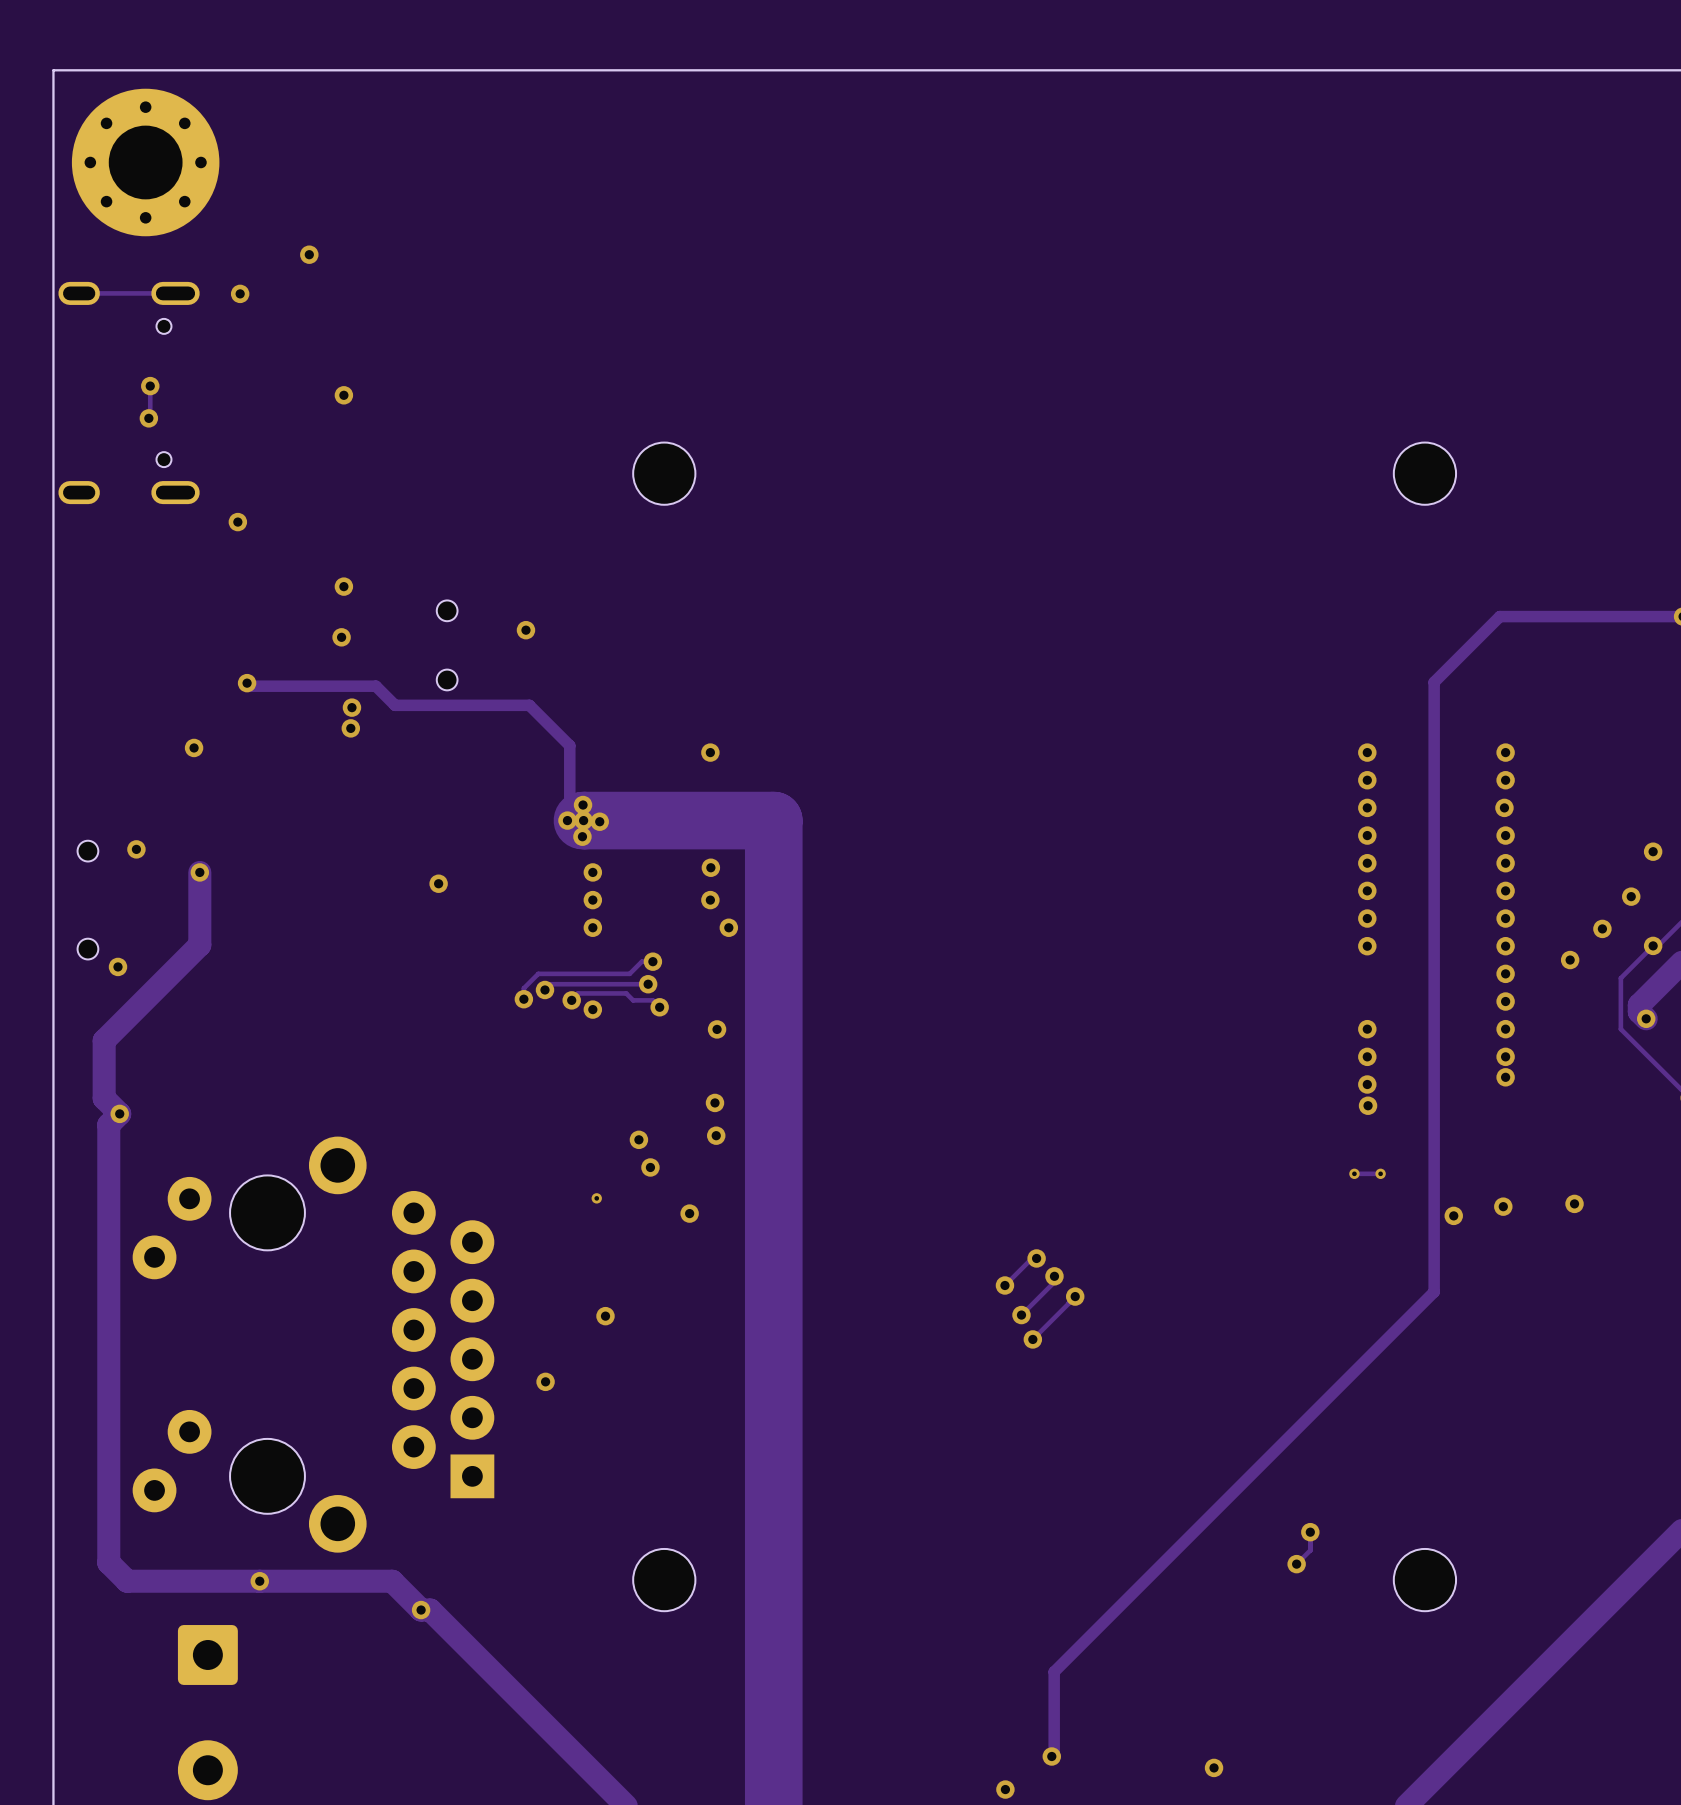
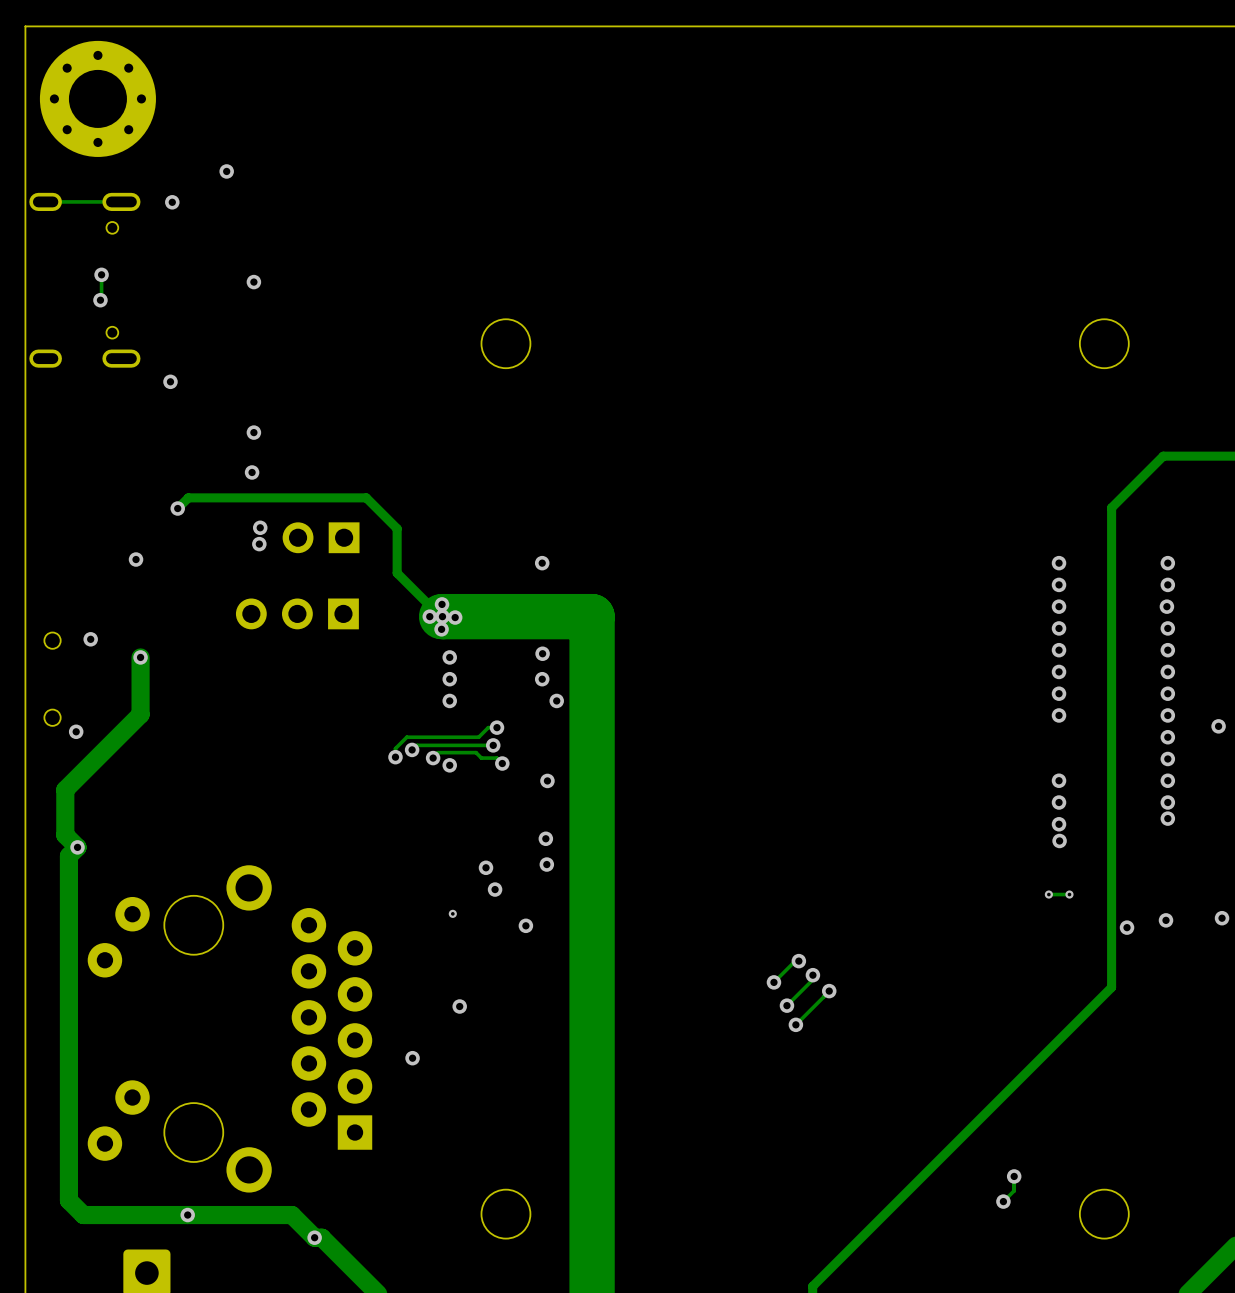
via: (525, 630) -> none
part: (447, 645) -> none
track: (247, 683) (250, 686) (375, 686) (395, 705) (529, 705) (569, 745) (569, 809) -> (177, 508) (188, 497) (366, 497) (397, 528) (397, 573) (431, 607)
part: none -> (321, 537)
part: none -> (297, 613)
via: (438, 883) -> none

